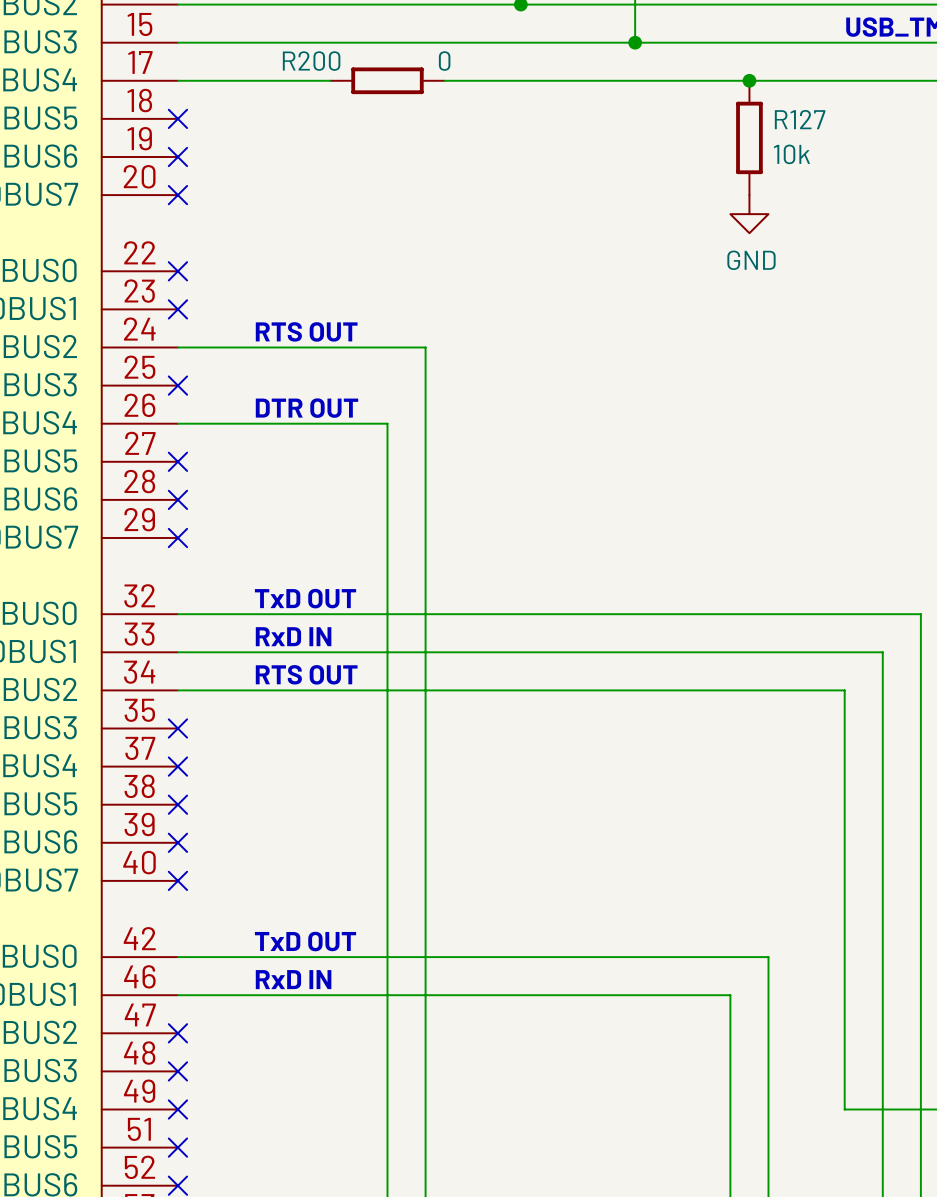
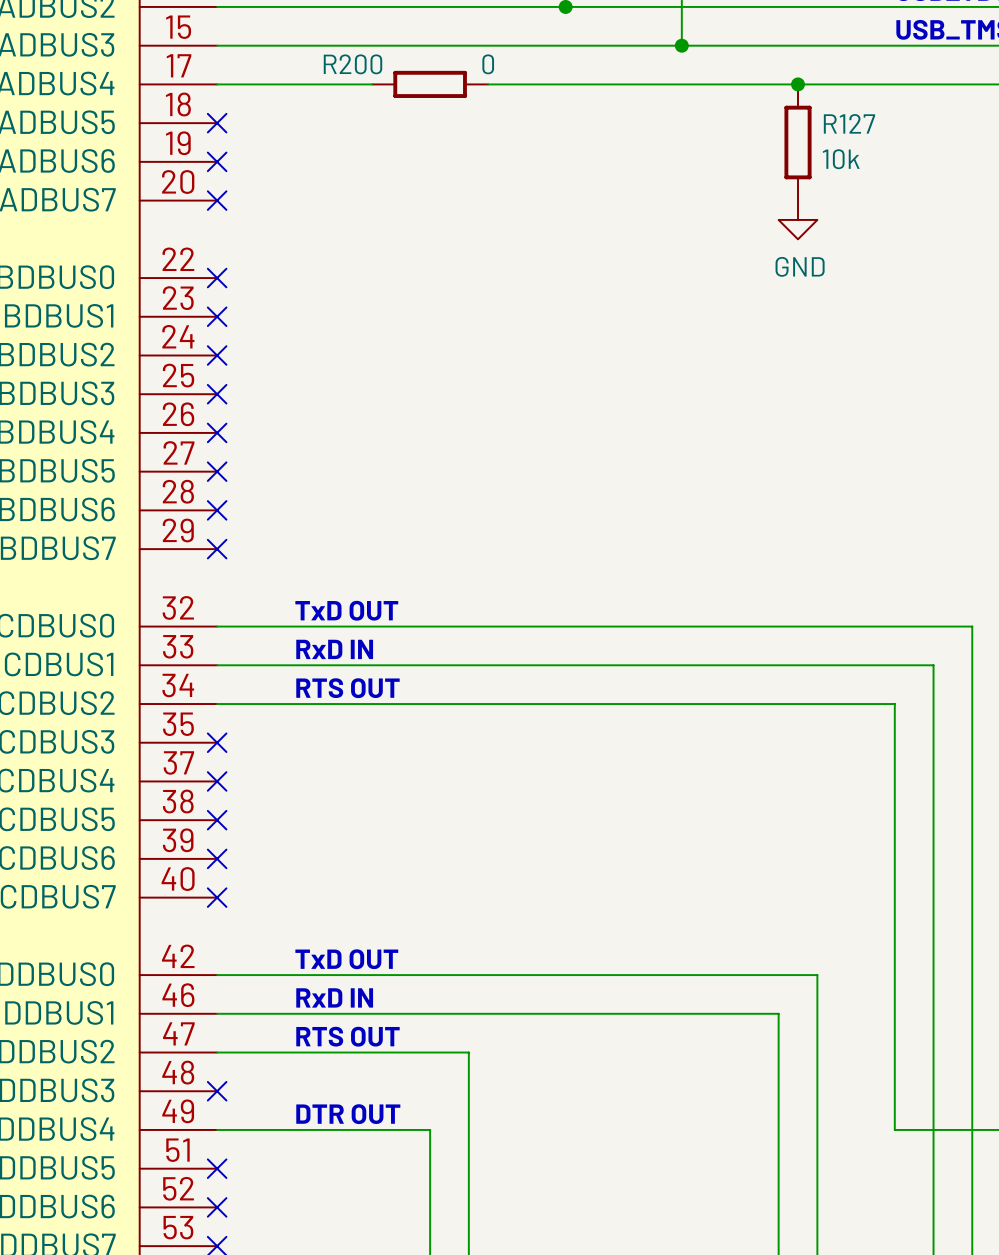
text: RTS OUT (306, 331) -> none
wire: (177, 347) (425, 347) (425, 1033) -> (217, 1052) (468, 1052)
no-connect mark: none -> (217, 355)
text: DTR OUT (306, 408) -> none
wire: (177, 423) (387, 423) (387, 1109) -> (217, 1129) (430, 1129)
no-connect mark: none -> (217, 432)
text: none -> RTS OUT (347, 1036)
no-connect mark: (177, 1033) -> none
text: none -> DTR OUT (348, 1114)
no-connect mark: (177, 1109) -> none

